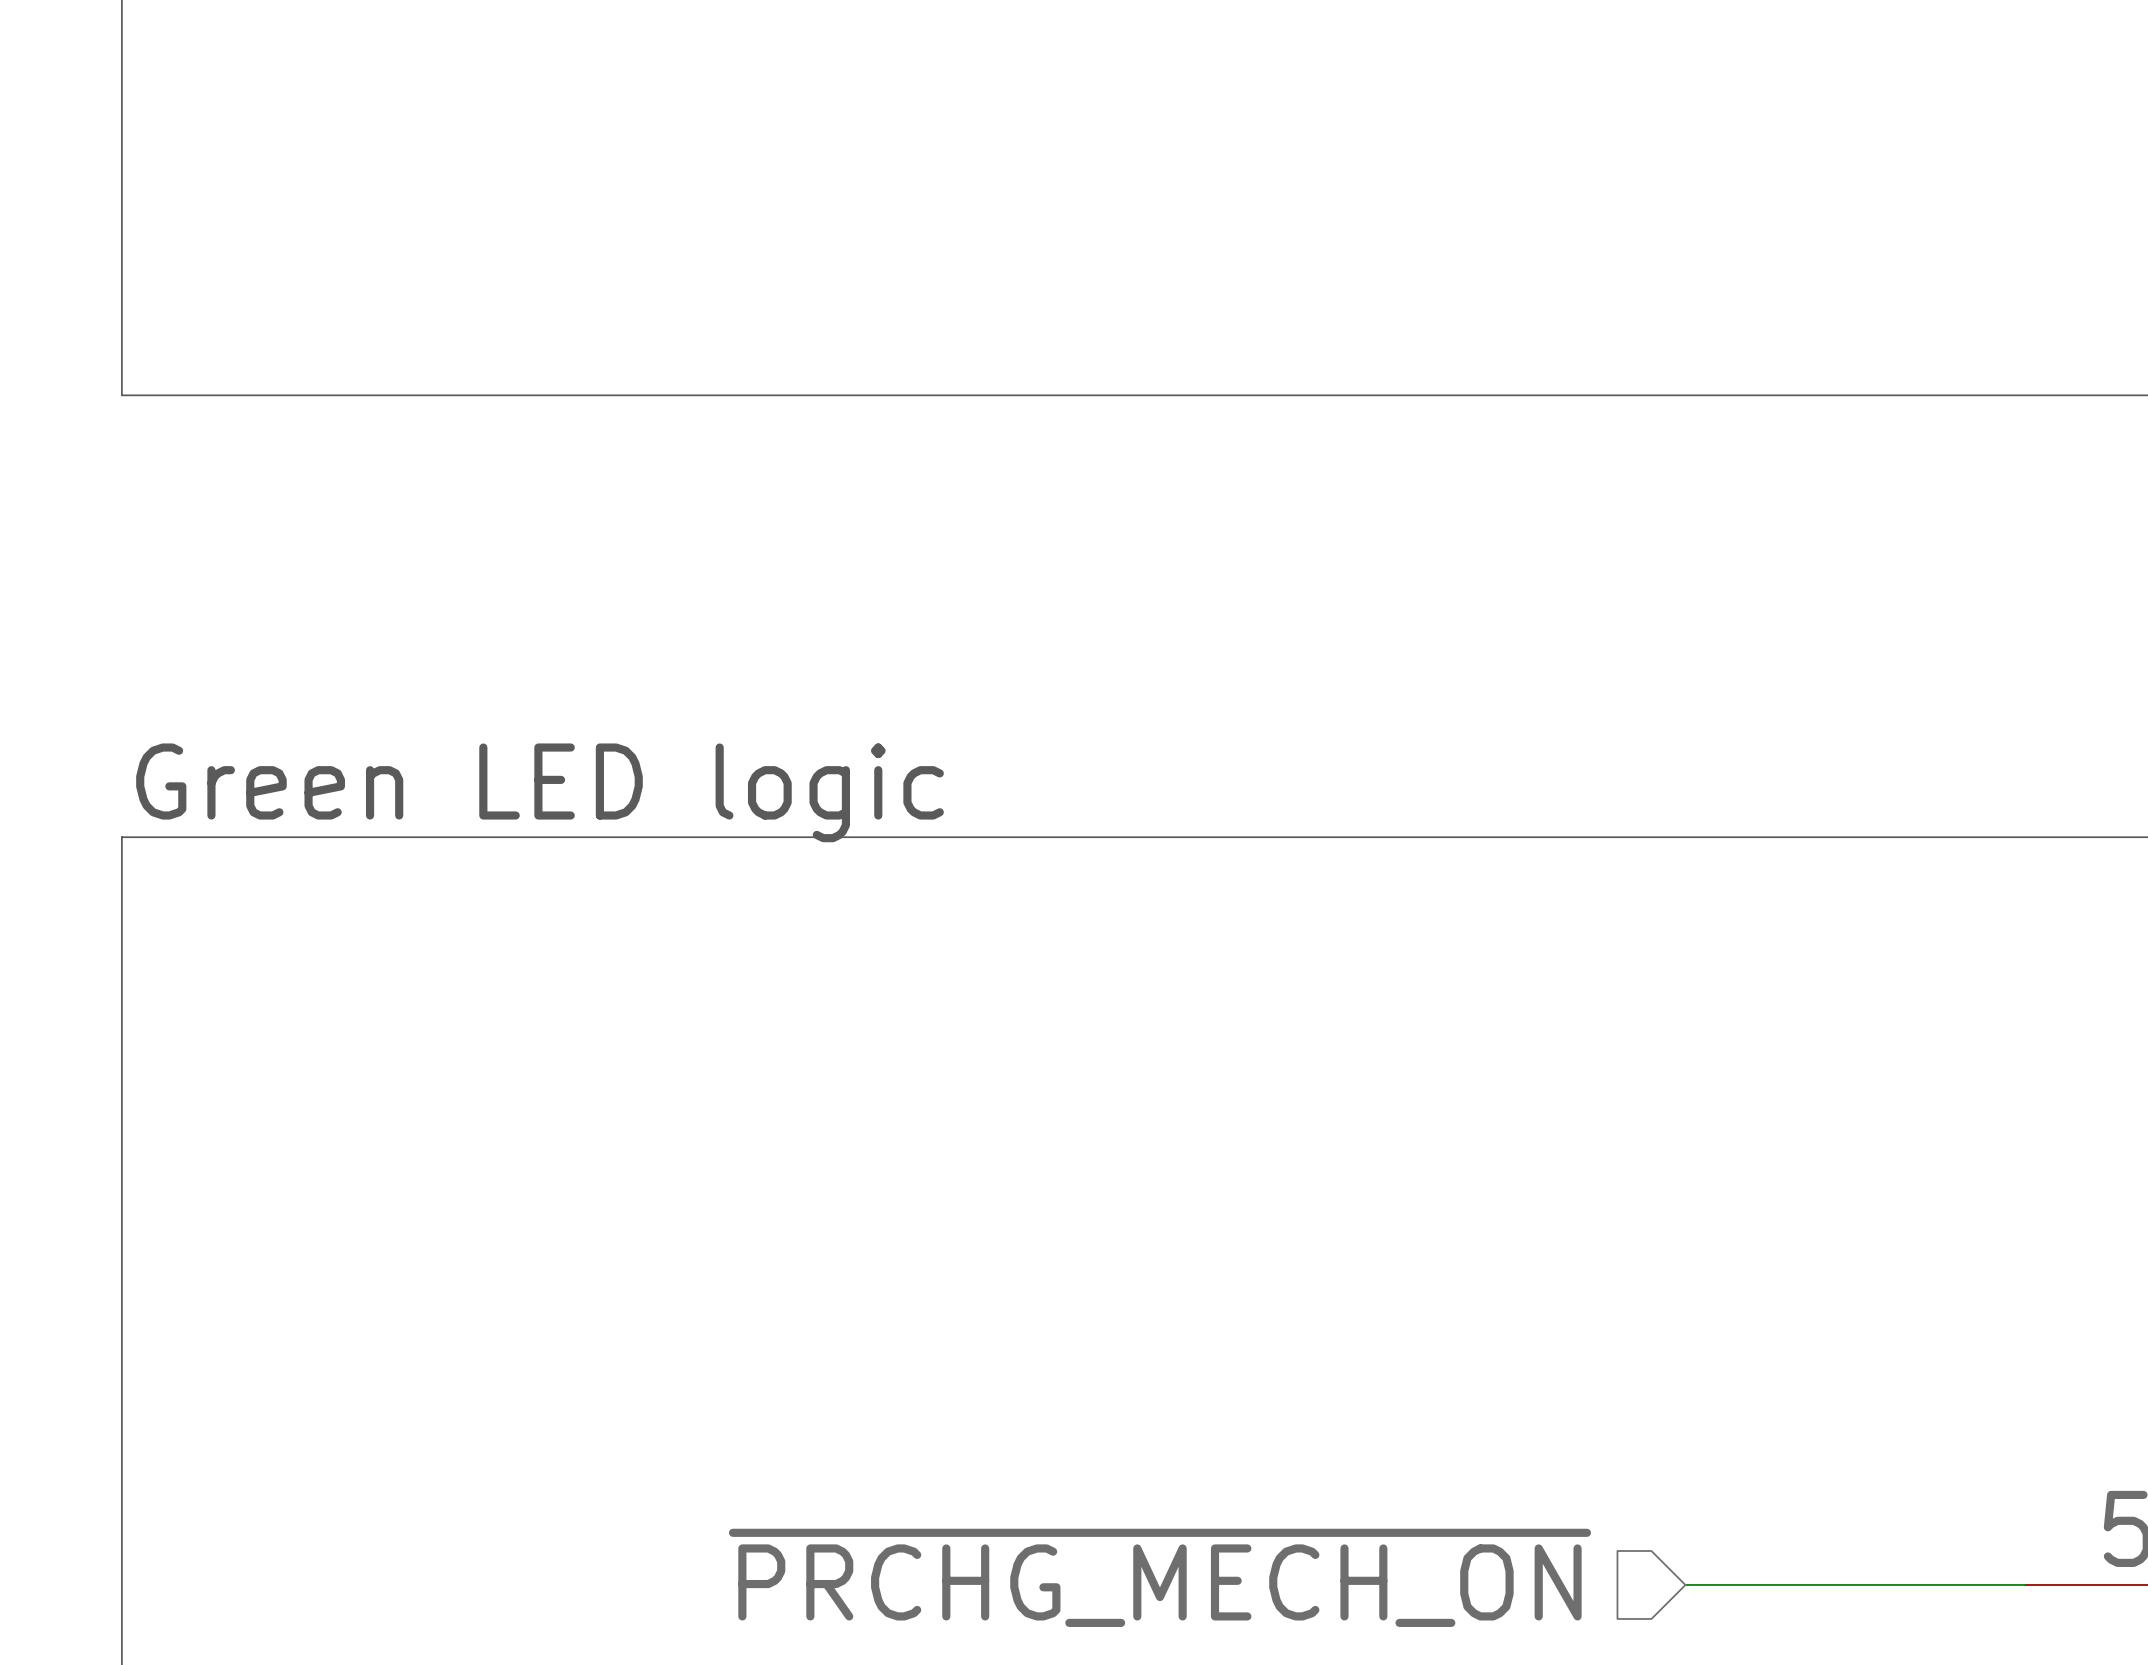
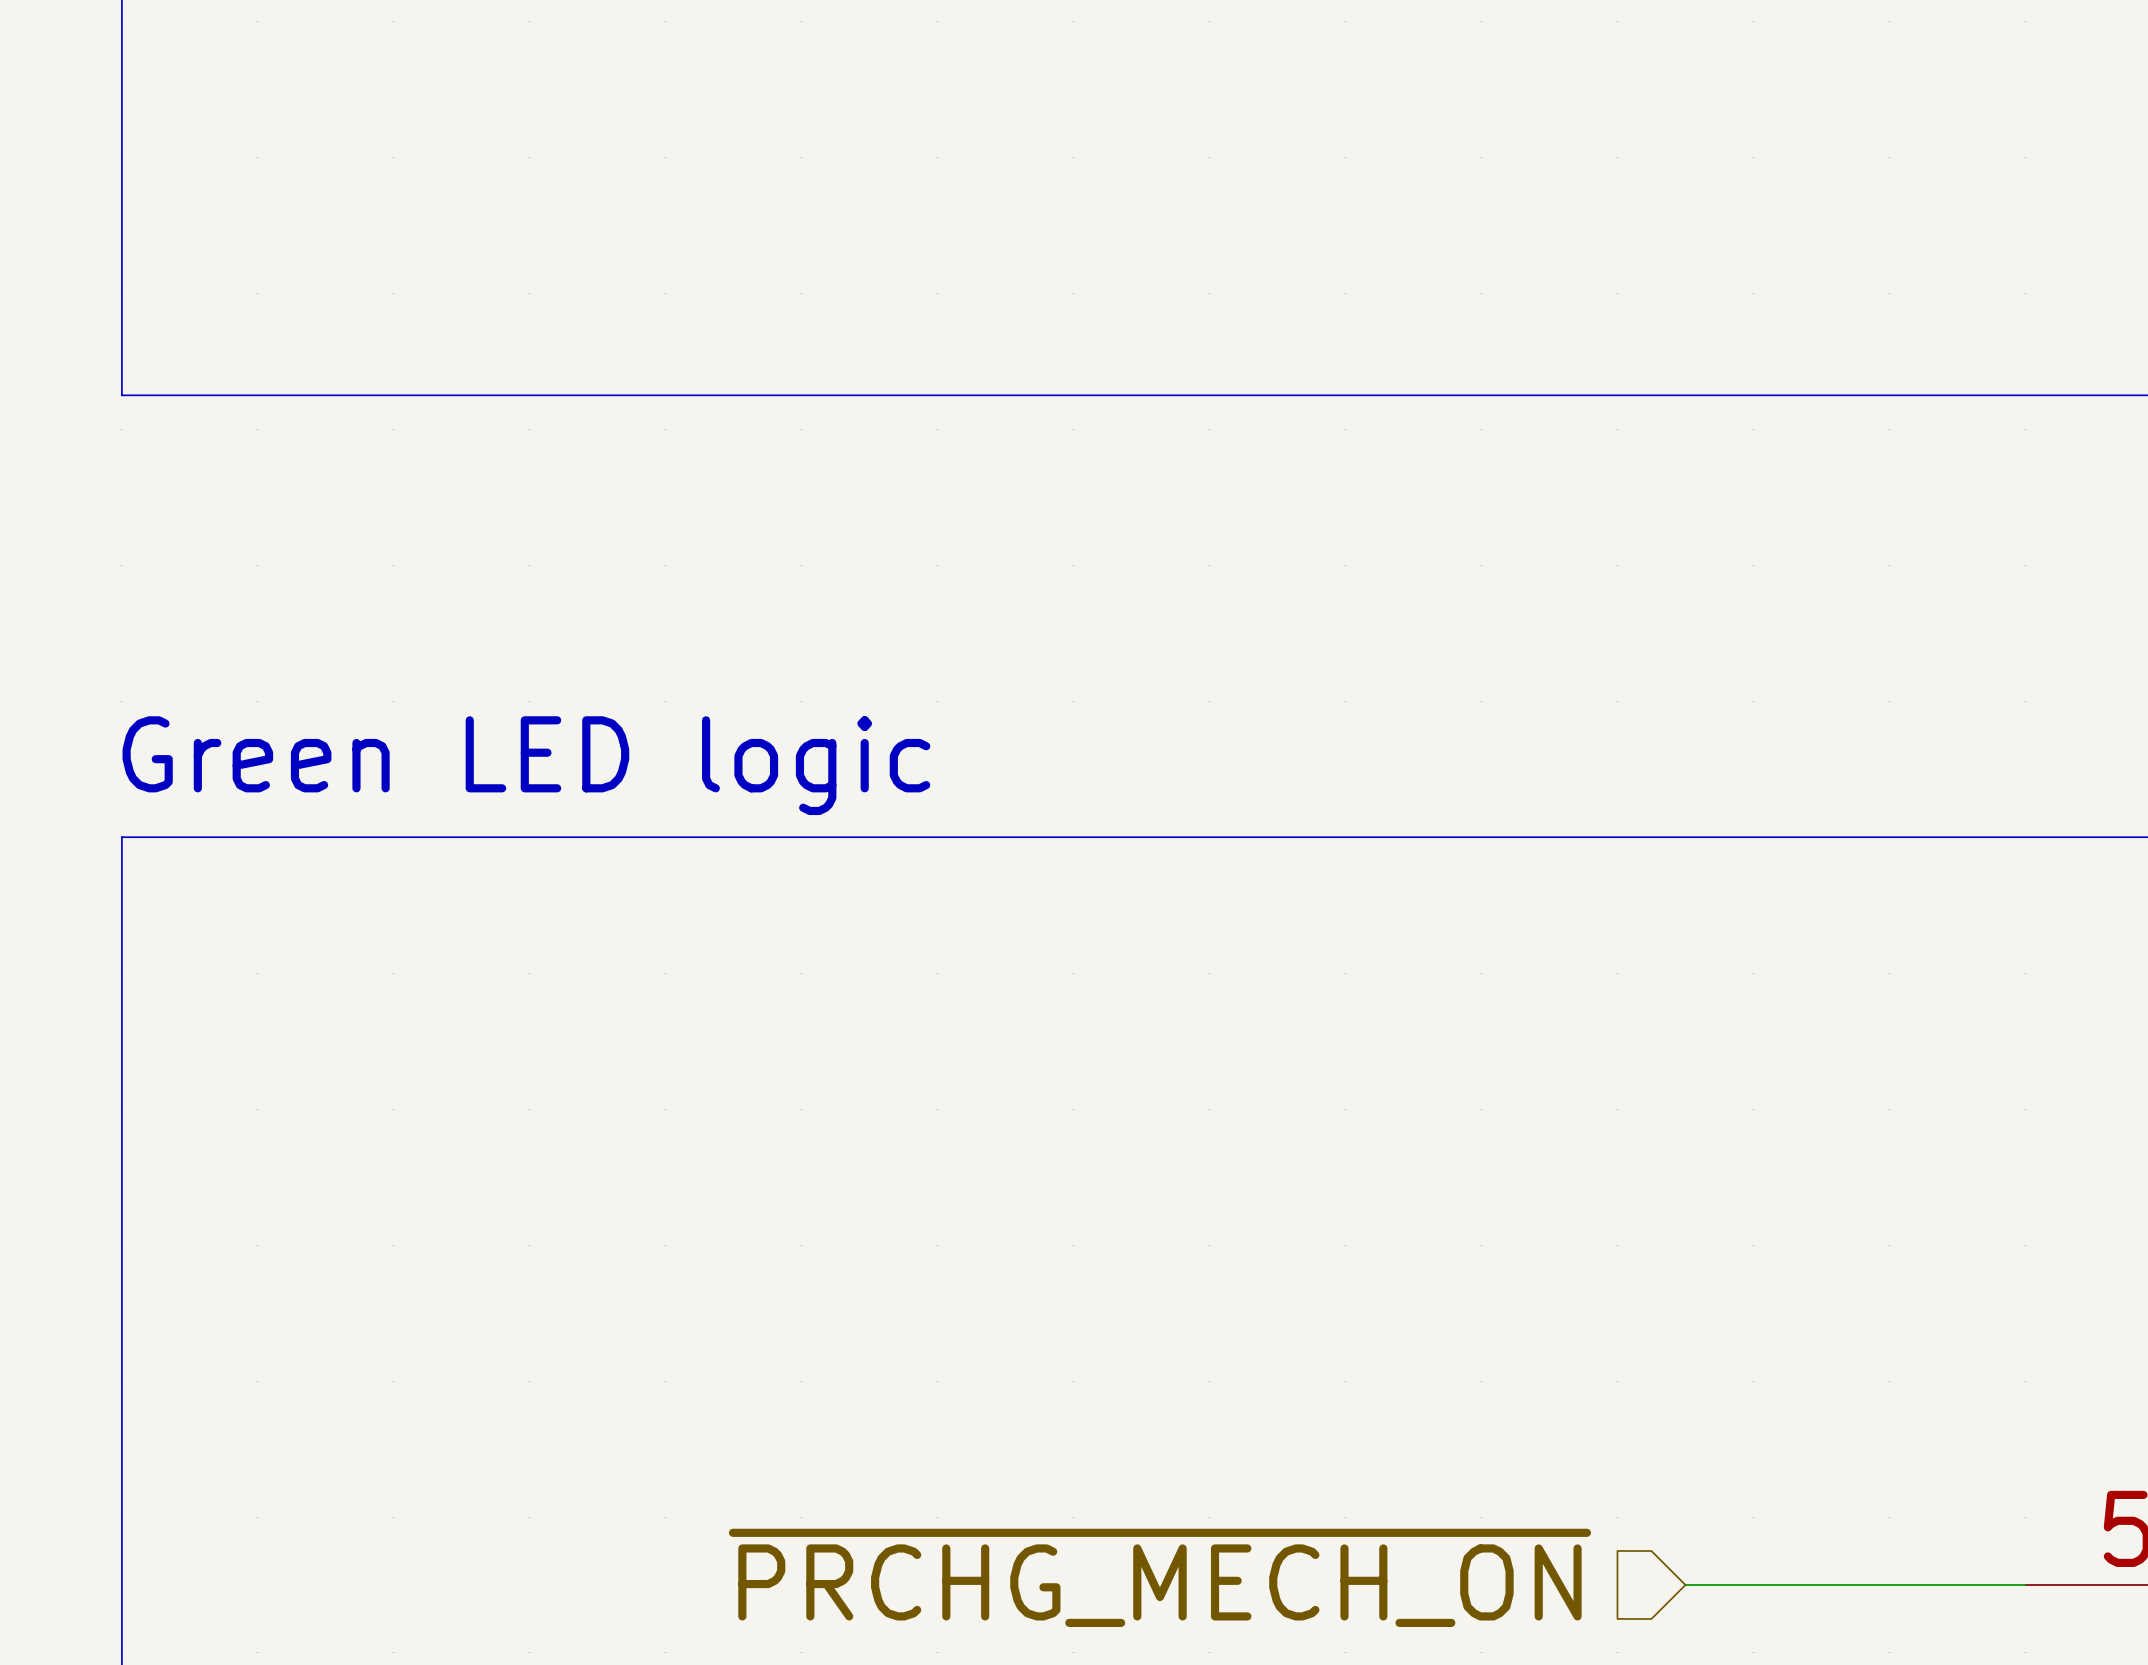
text position: Green LED logic (540, 792) -> Green LED logic (526, 765)

